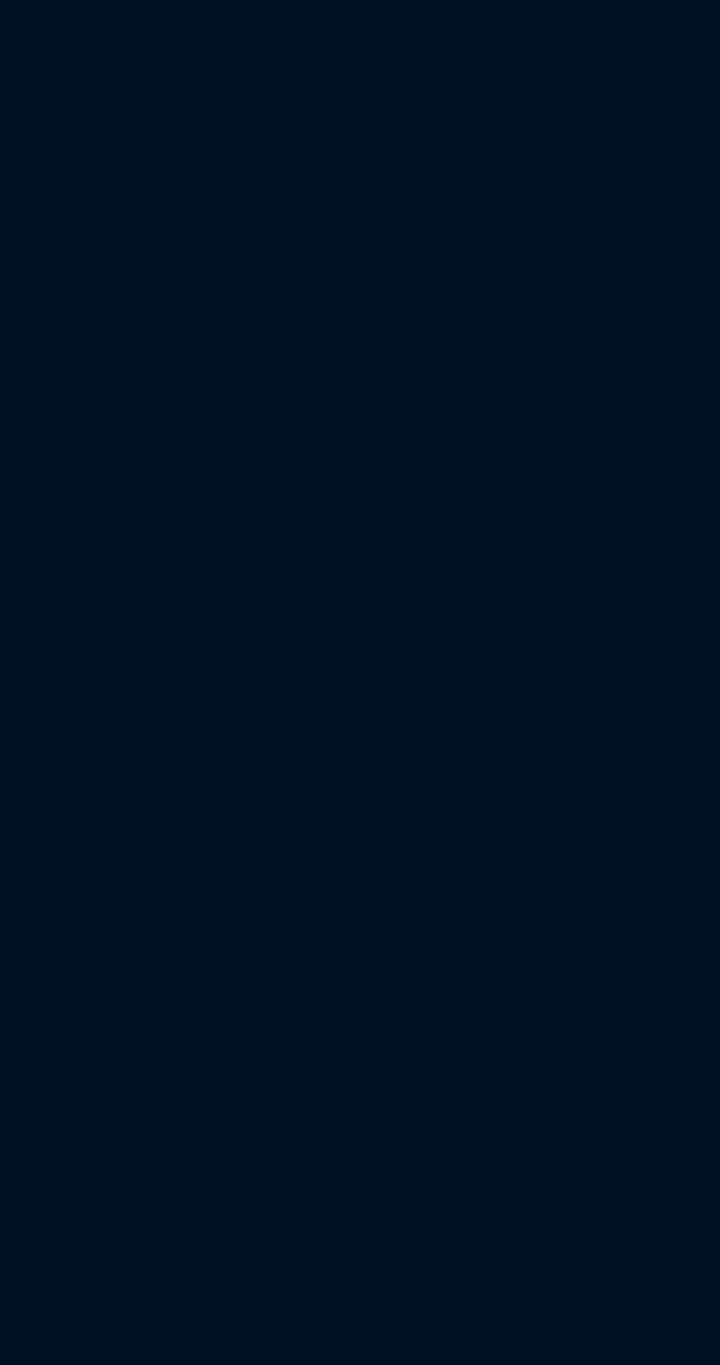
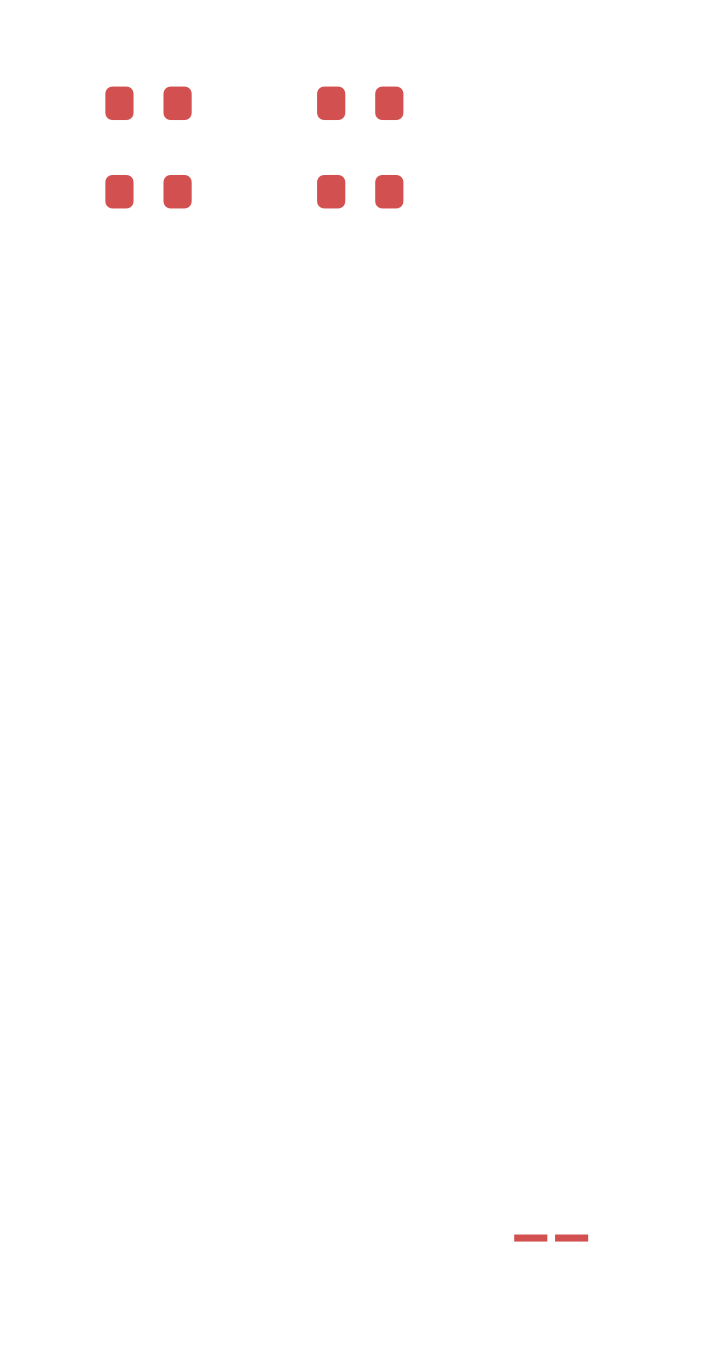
part: none -> (148, 103)
part: none -> (360, 103)
part: none -> (148, 191)
part: none -> (360, 191)
part: none -> (551, 1238)

